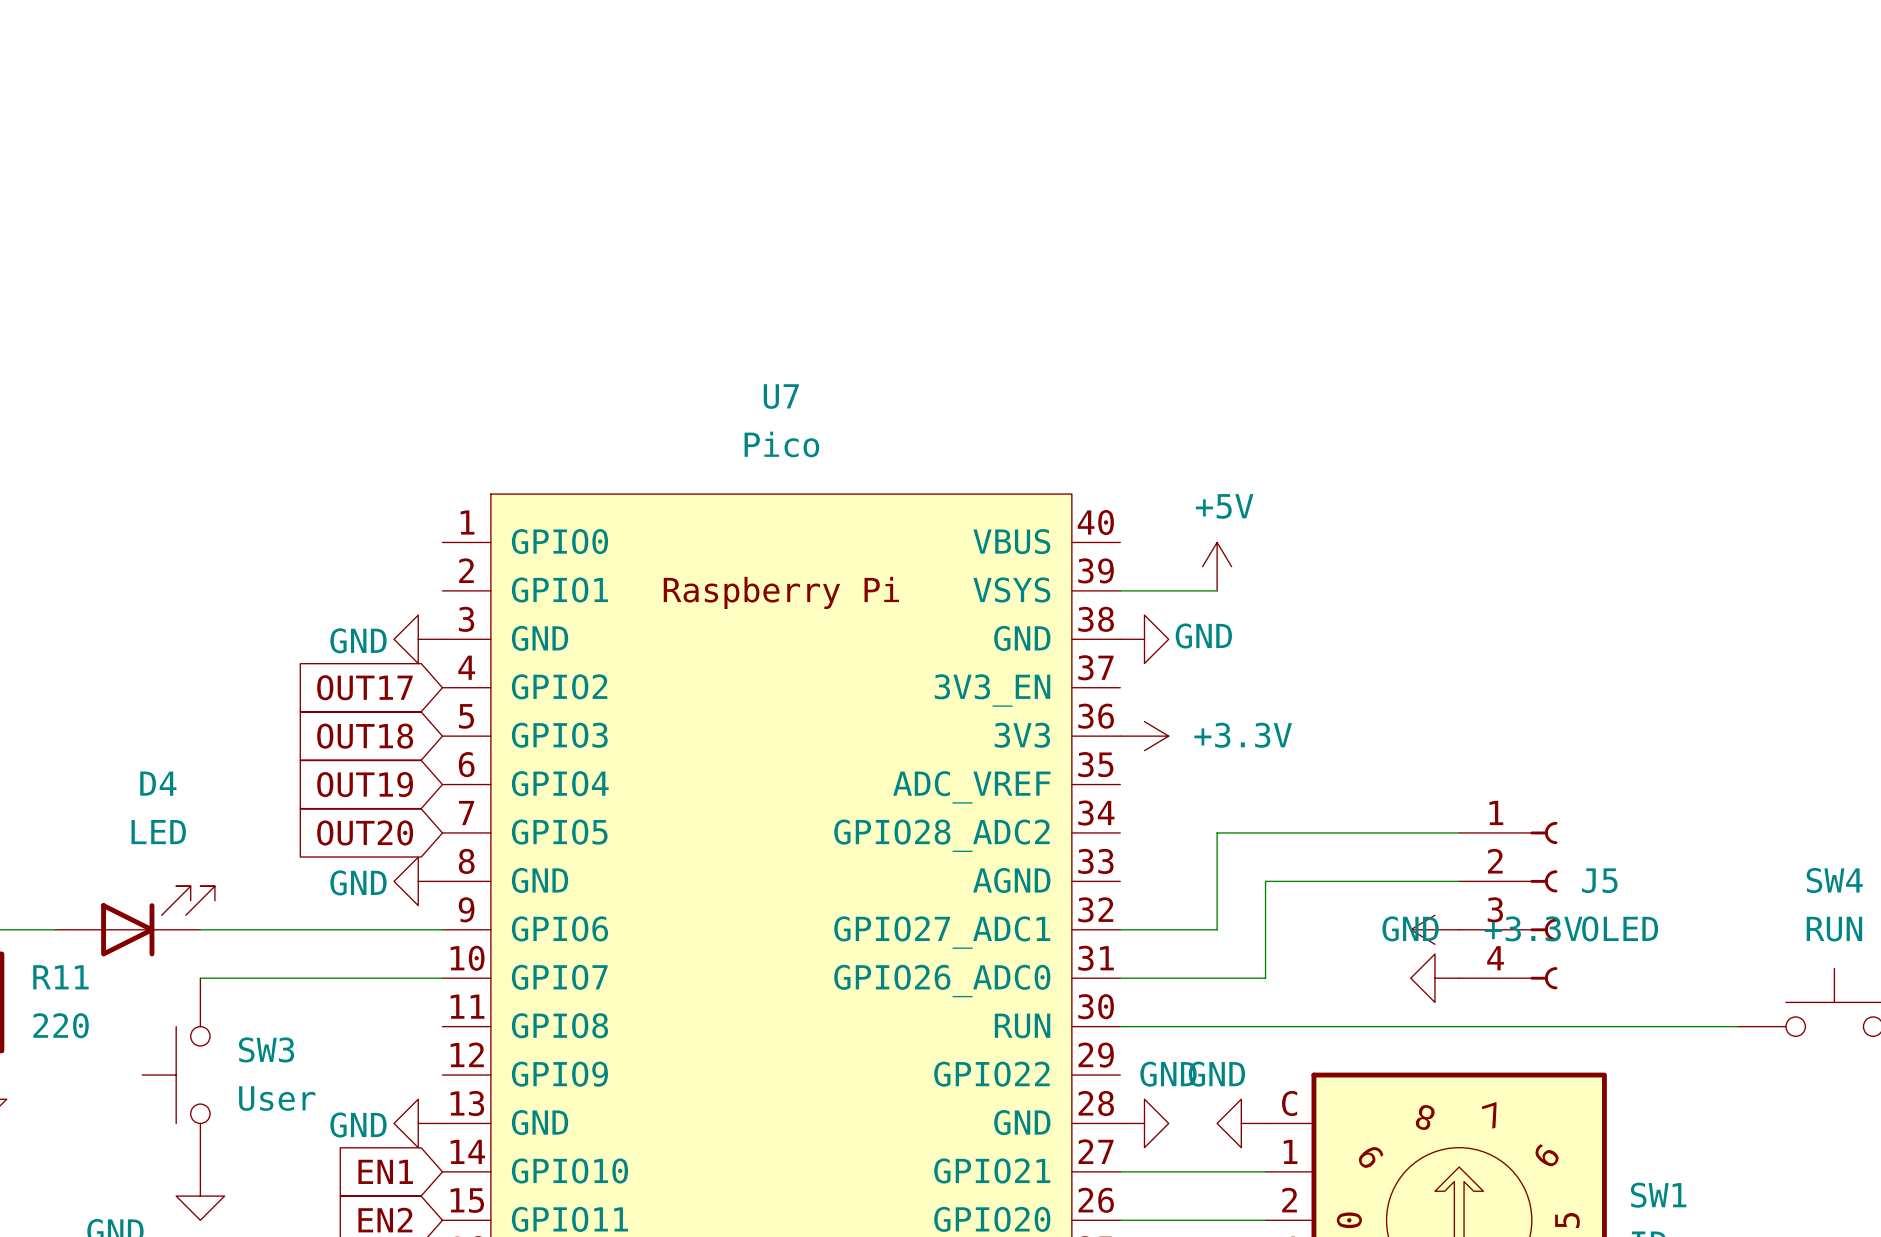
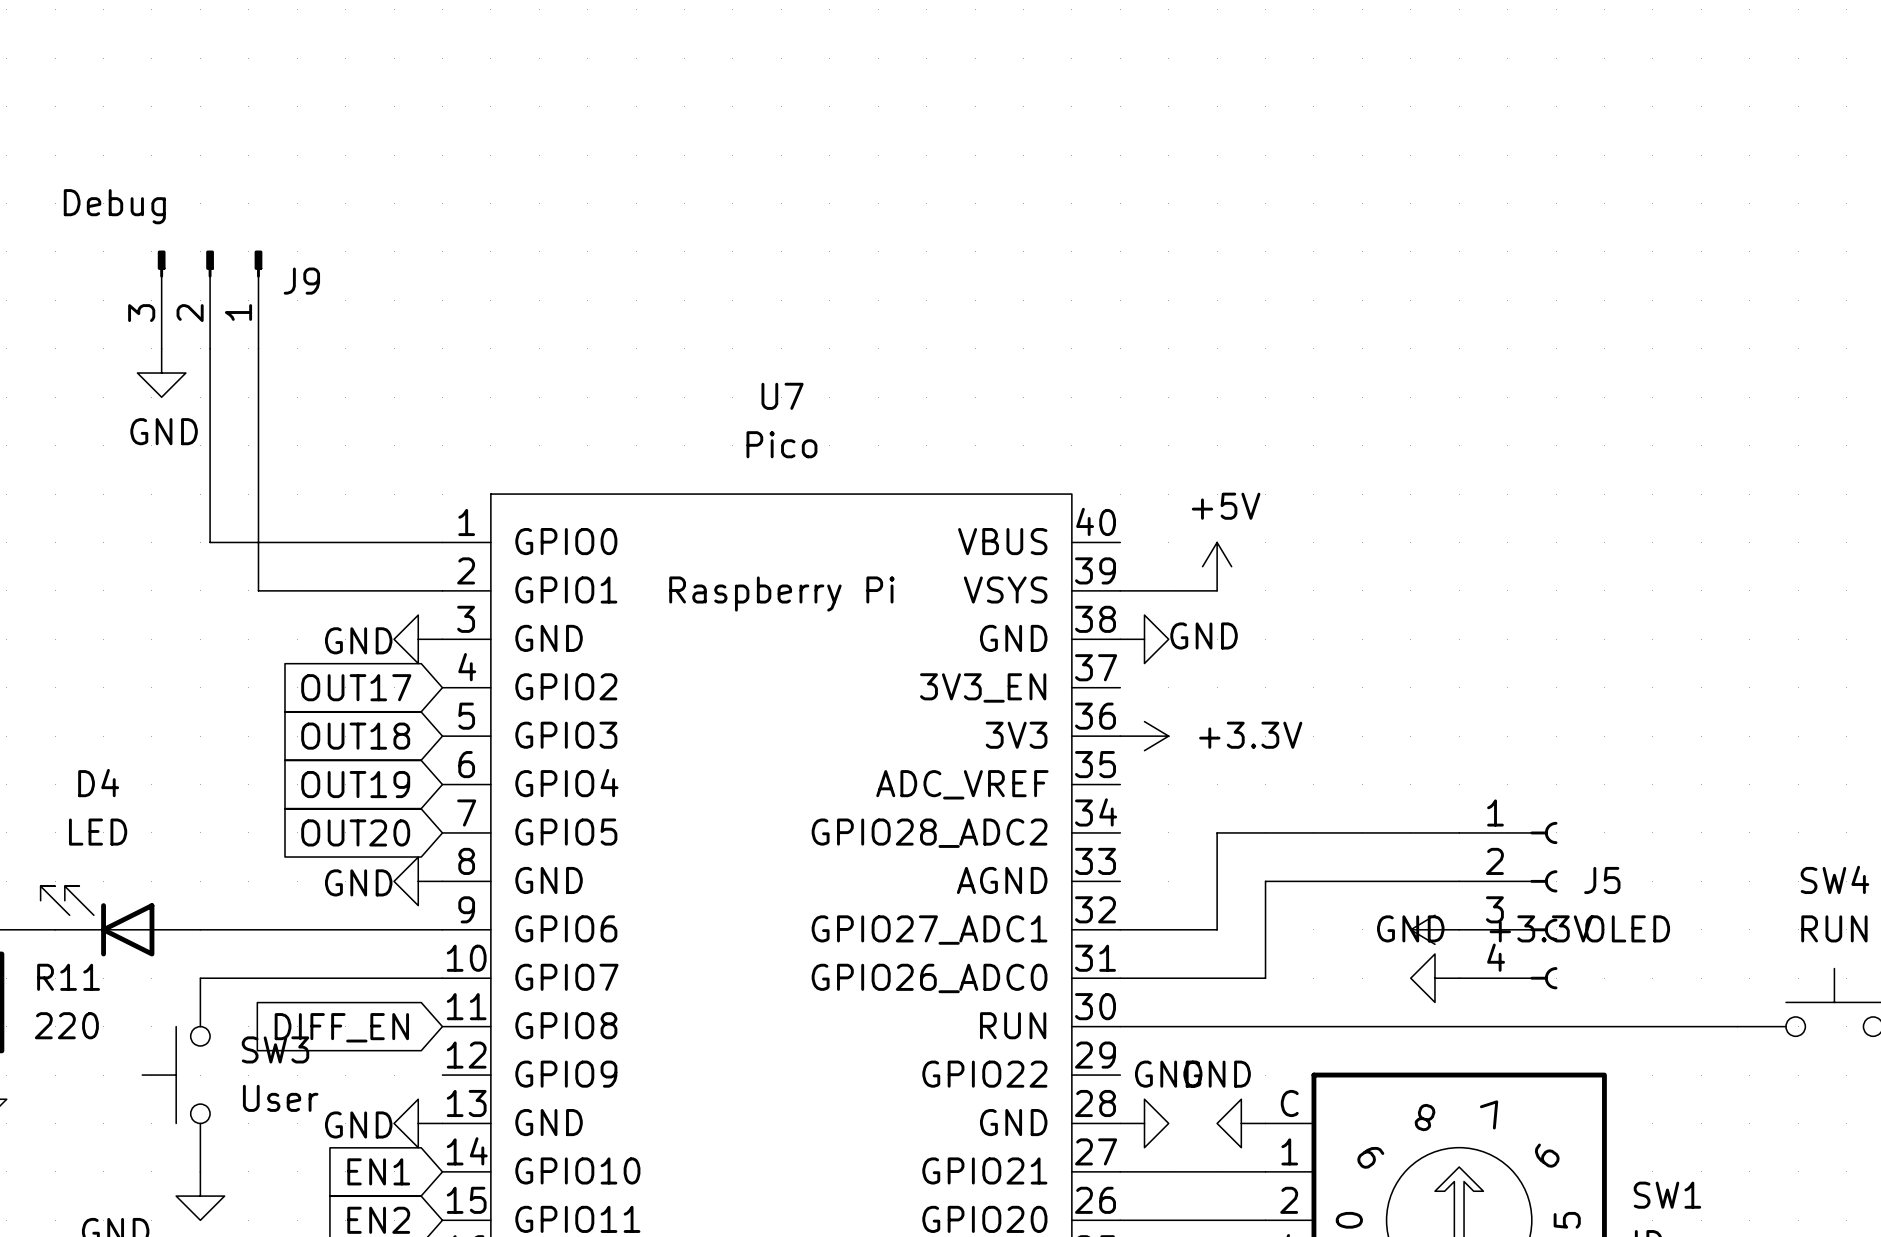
J9: none -> Debug (210, 299)
wire: none -> (210, 348) (210, 542) (442, 542)
wire: none -> (258, 348) (258, 590) (442, 590)
power symbol: none -> GND (161, 373)
D4 flip: as is (158, 921) -> left-right (97, 921)
global label: none -> DIFF_EN (341, 1027)

